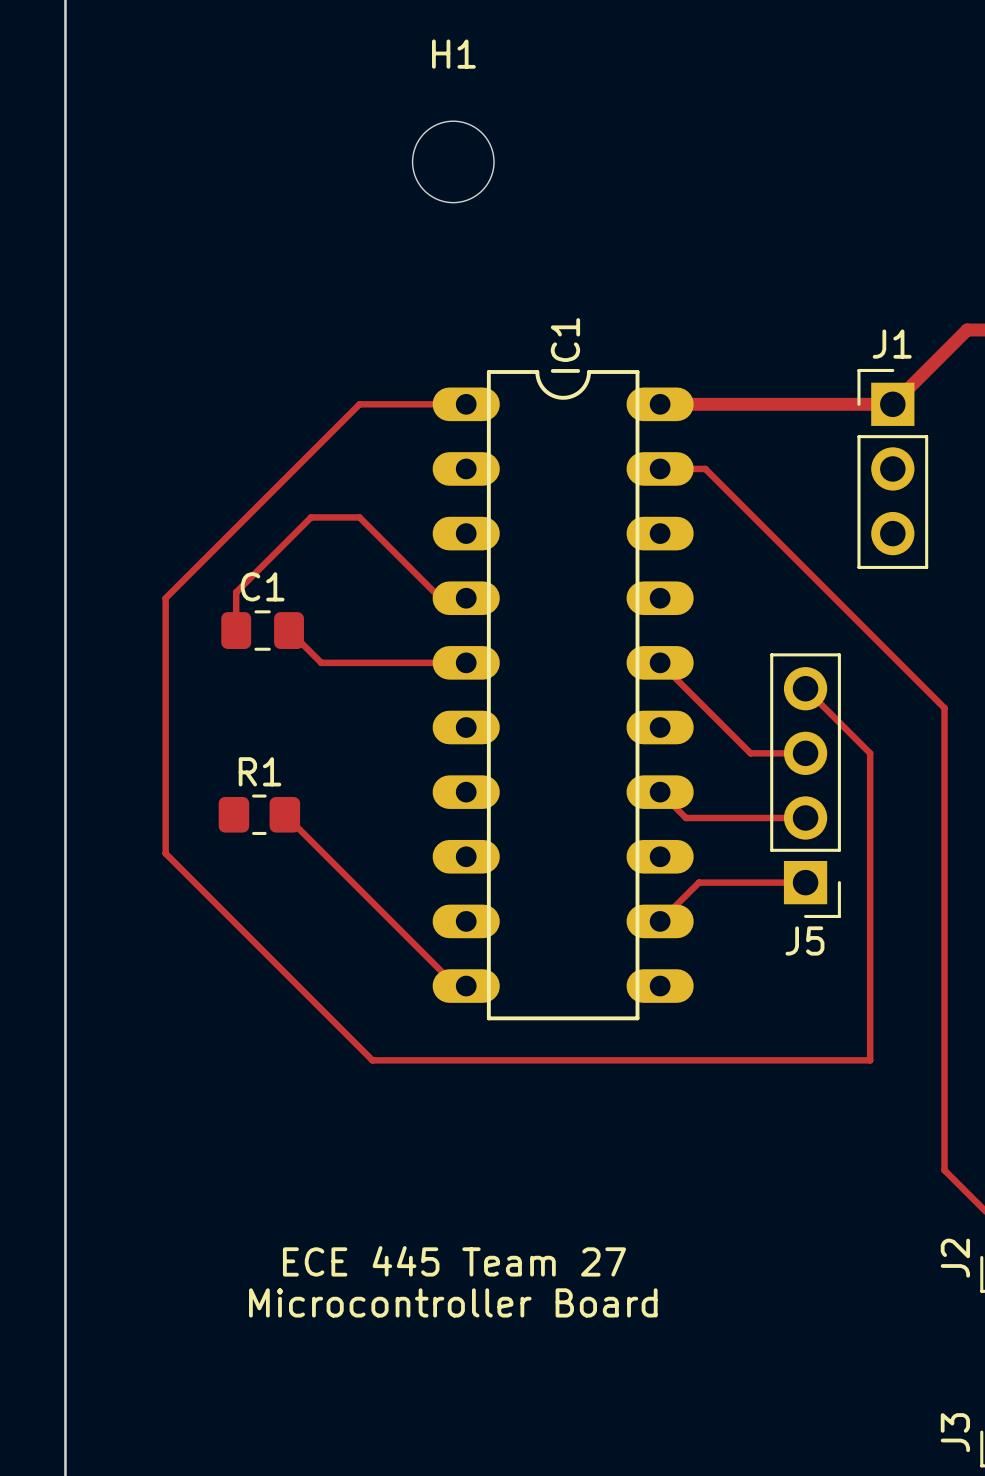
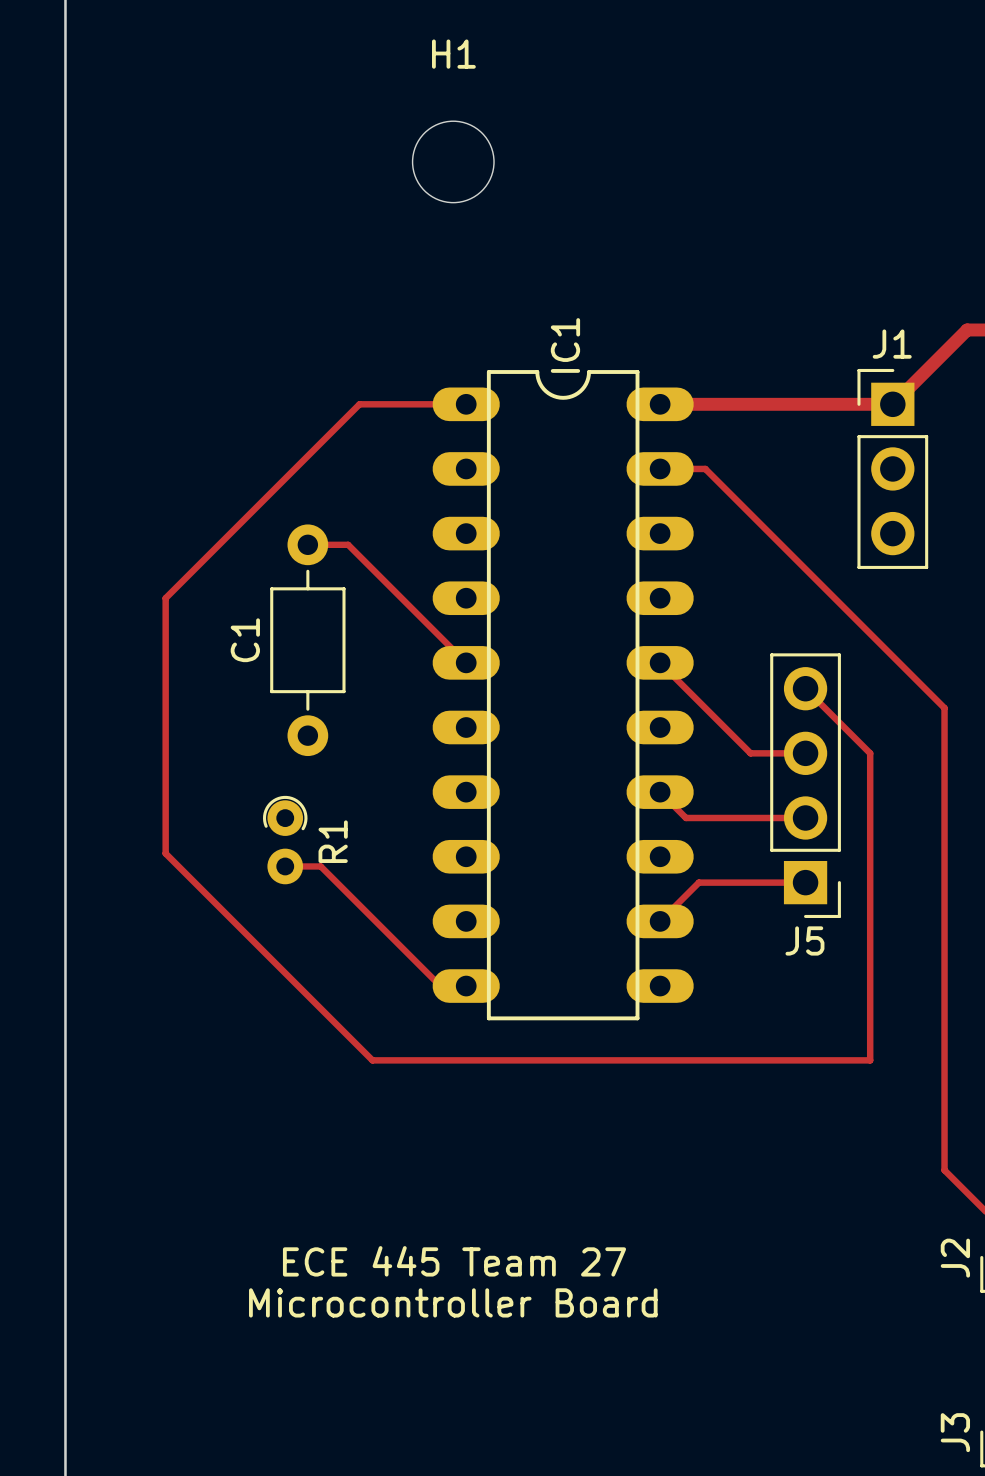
C1 name position: C1 (262, 586) -> C1 (245, 640)
track: (440, 598) (359, 517) (311, 517) (236, 592) (236, 630) -> none
C1 footprint: [221, 610, 304, 651] -> [270, 524, 346, 757]
track: (289, 630) (321, 662) (466, 662) -> (307, 544) (348, 544) (466, 662)
R1 name position: R1 (259, 771) -> R1 (333, 841)
R1 footprint: [218, 794, 301, 835] -> [262, 795, 308, 885]
track: (284, 814) (456, 986) -> none
track: none -> (285, 866) (320, 866) (440, 986) (466, 986)

